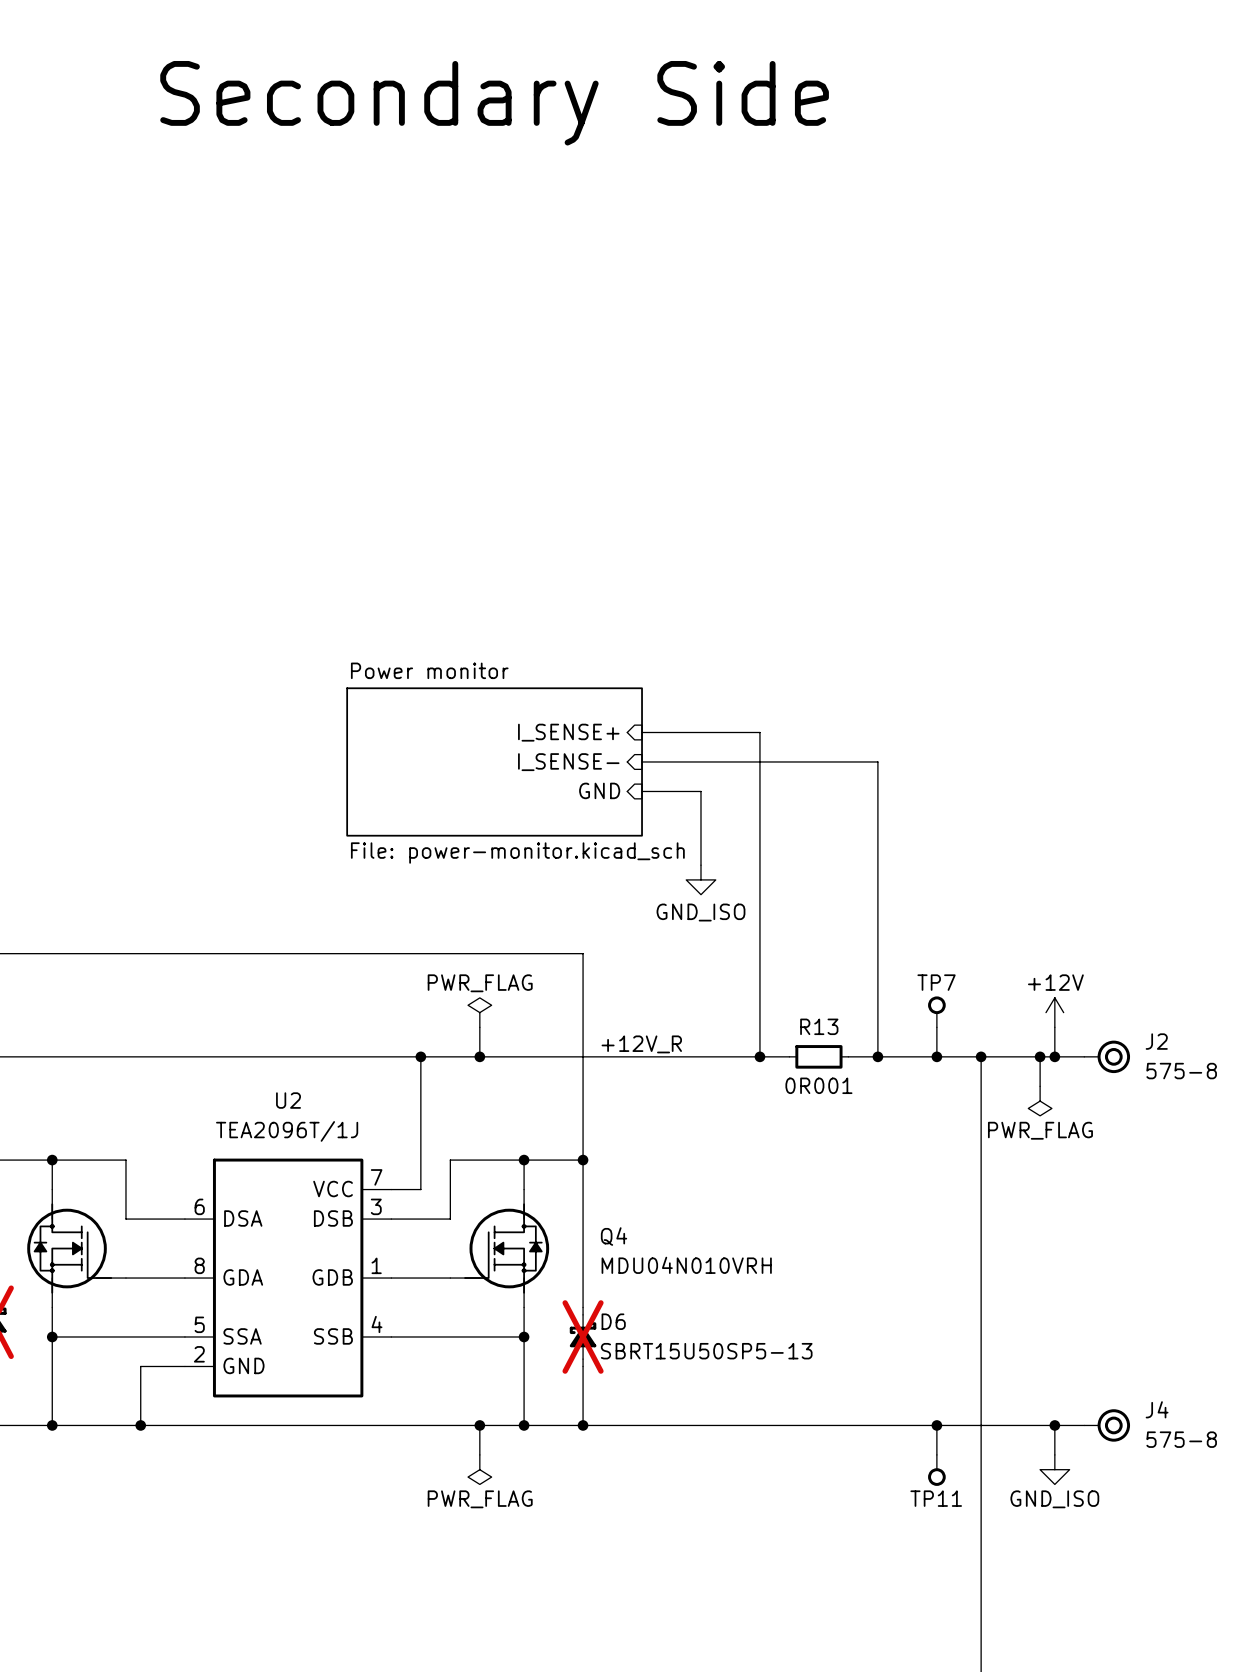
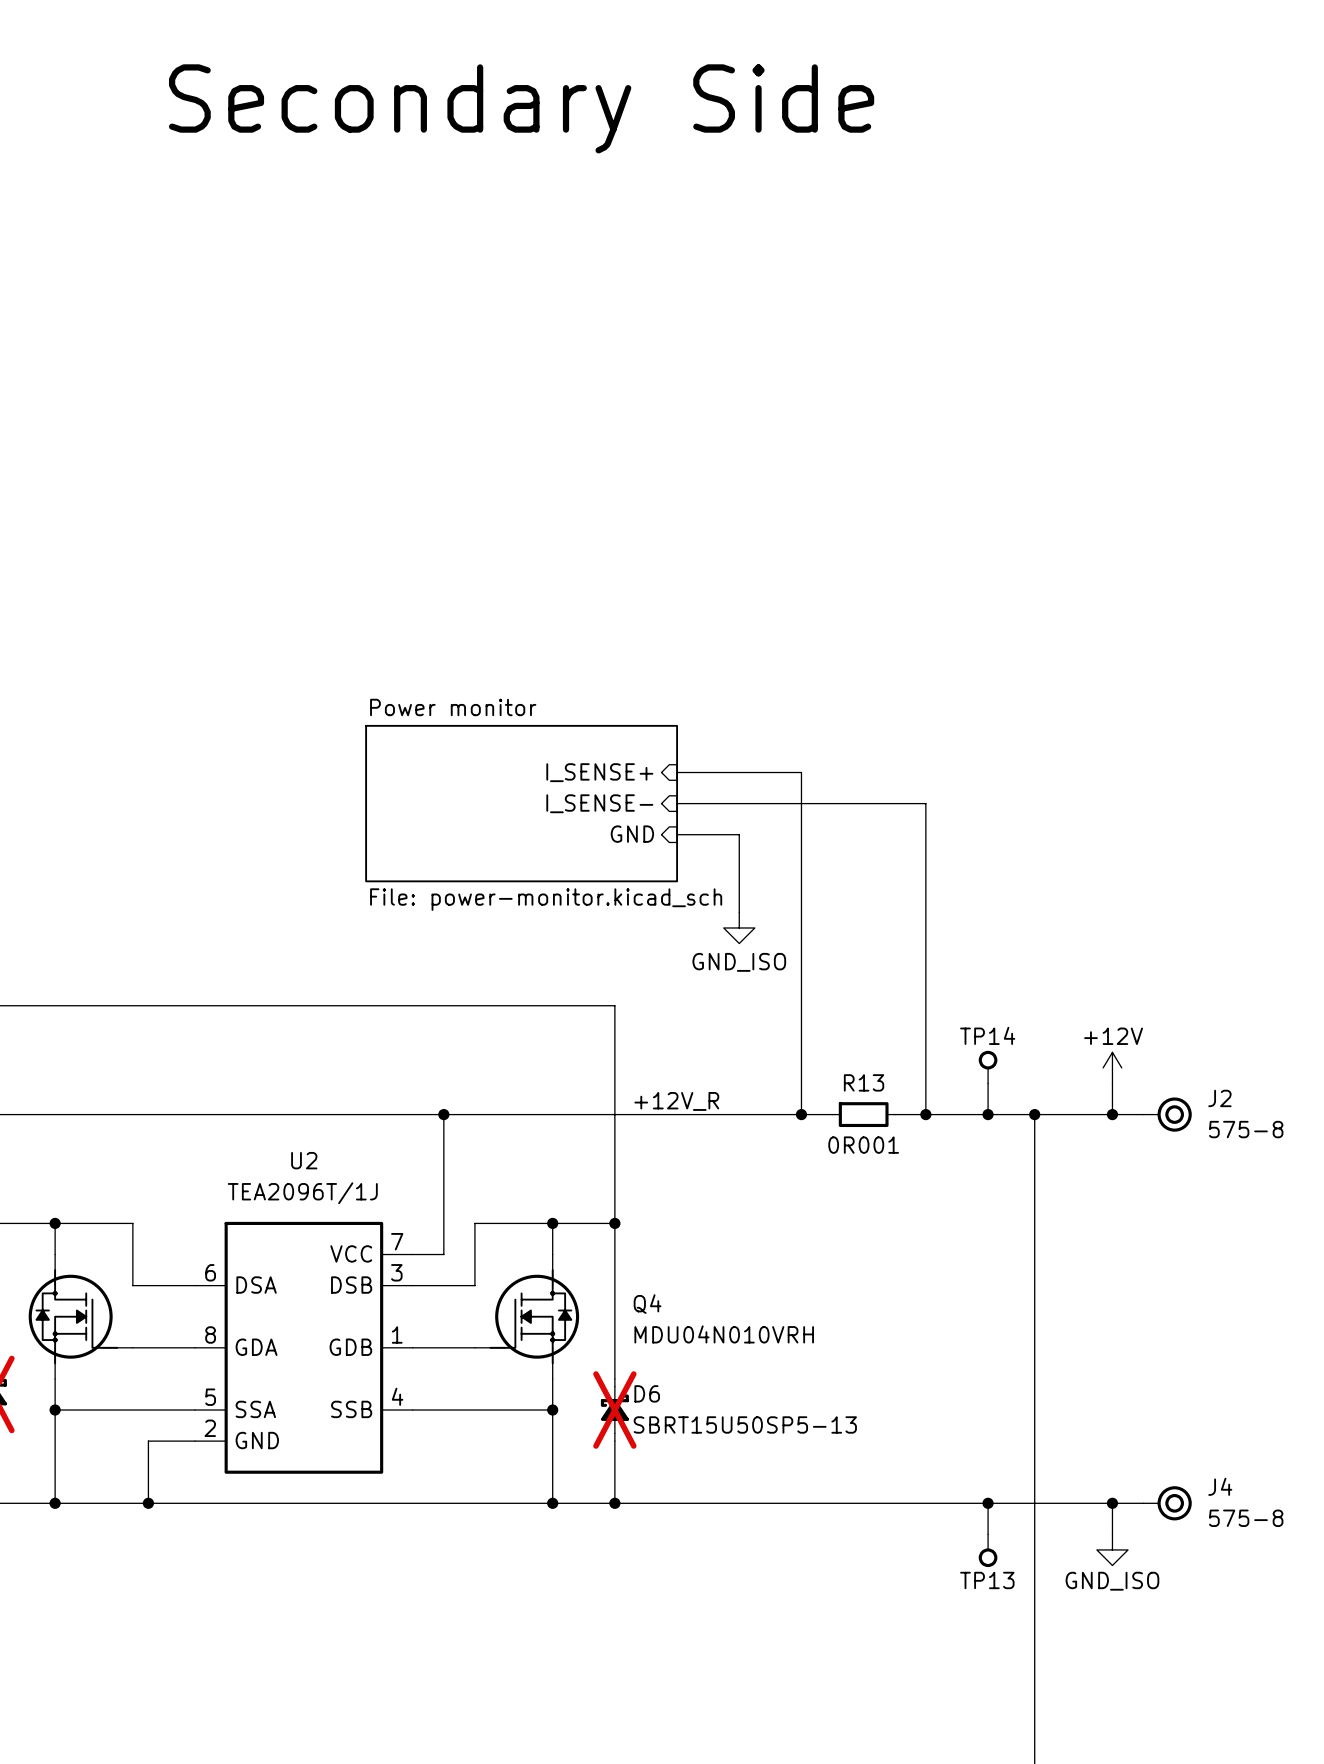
TP7 name: TP7 (936, 982) -> TP14 (987, 1035)
power symbol: PWR_FLAG (479, 1012) -> none
wire: (479, 1027) (479, 1056) -> none
junction: (479, 1056) -> none
wire: (1040, 1056) (1040, 1086) -> none
junction: (1040, 1056) -> none
power symbol: PWR_FLAG (1040, 1101) -> none
wire: (479, 1425) (479, 1454) -> none
junction: (479, 1425) -> none
power symbol: PWR_FLAG (479, 1469) -> none
TP11 name: TP11 (936, 1498) -> TP13 (987, 1580)

